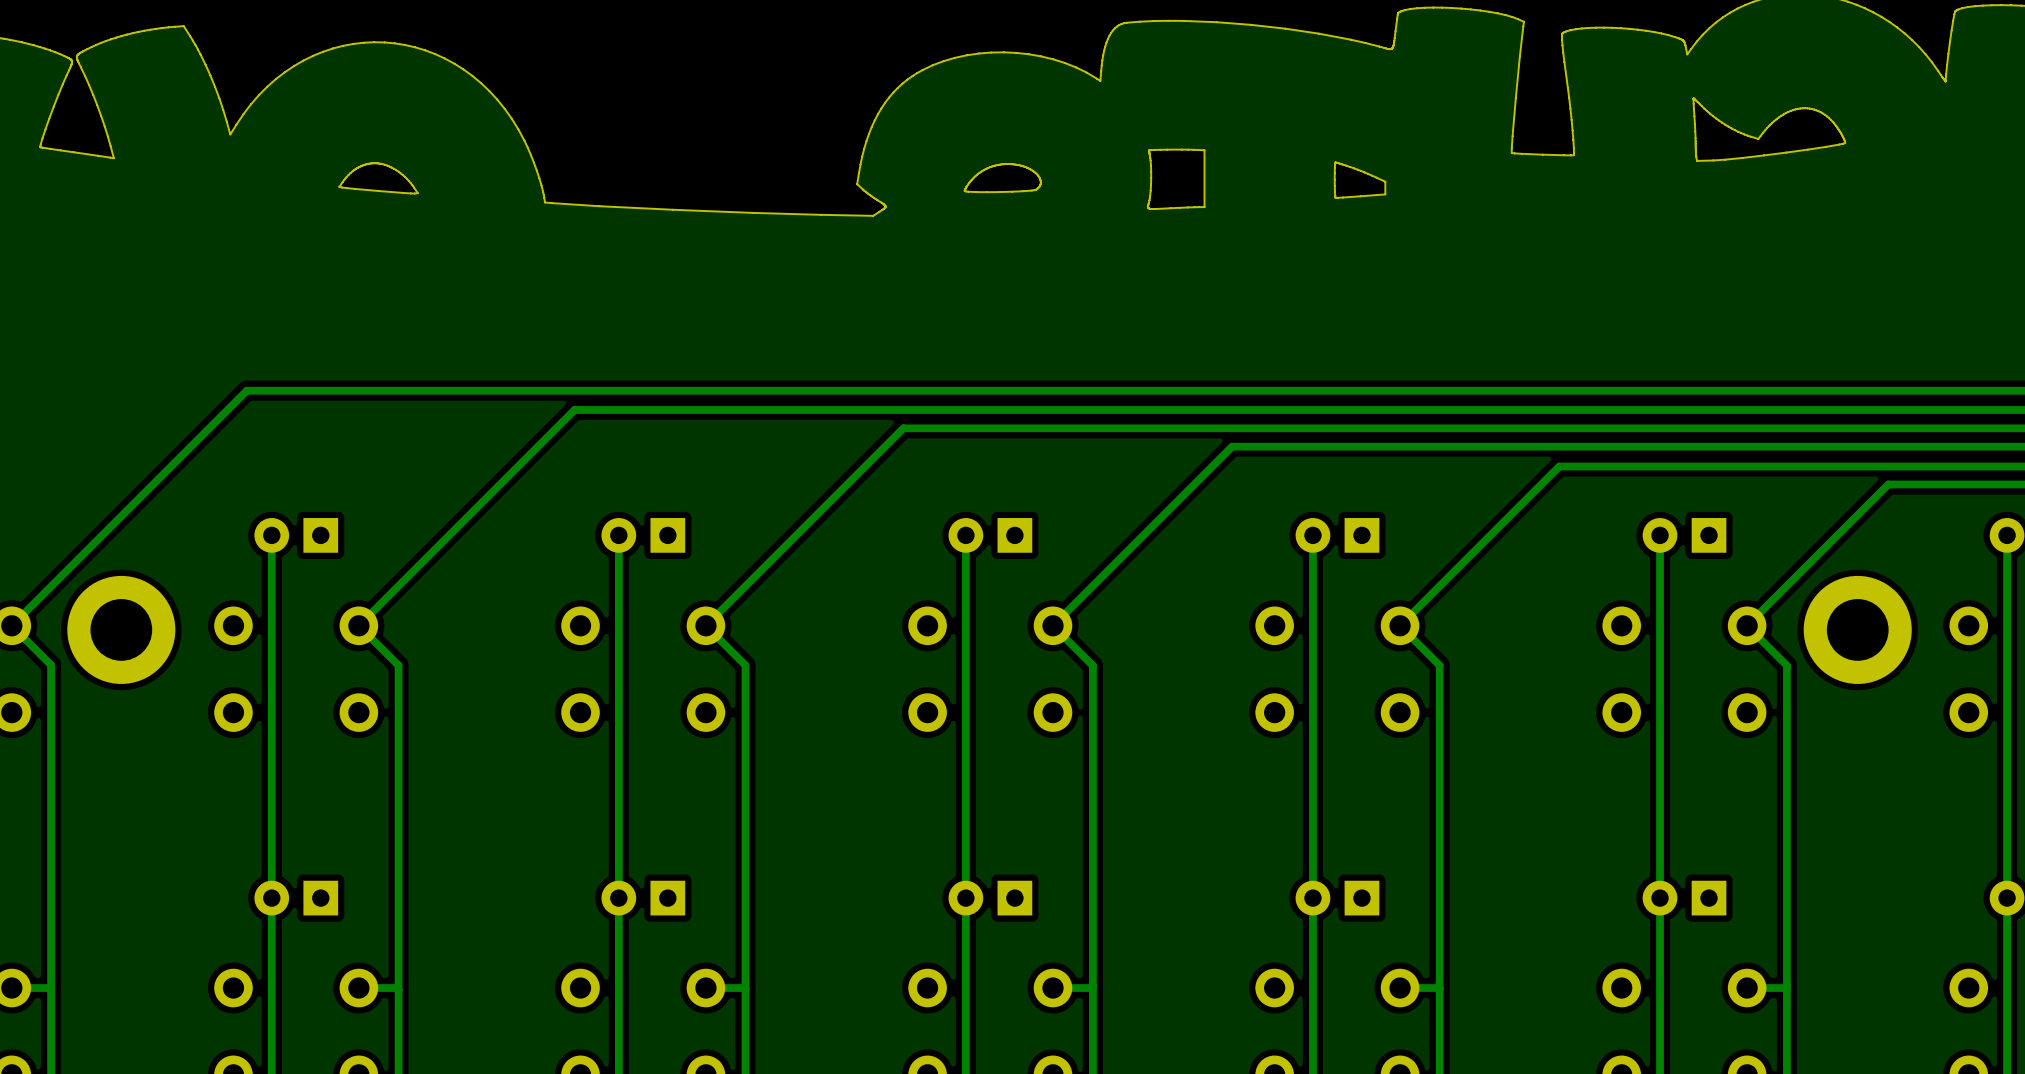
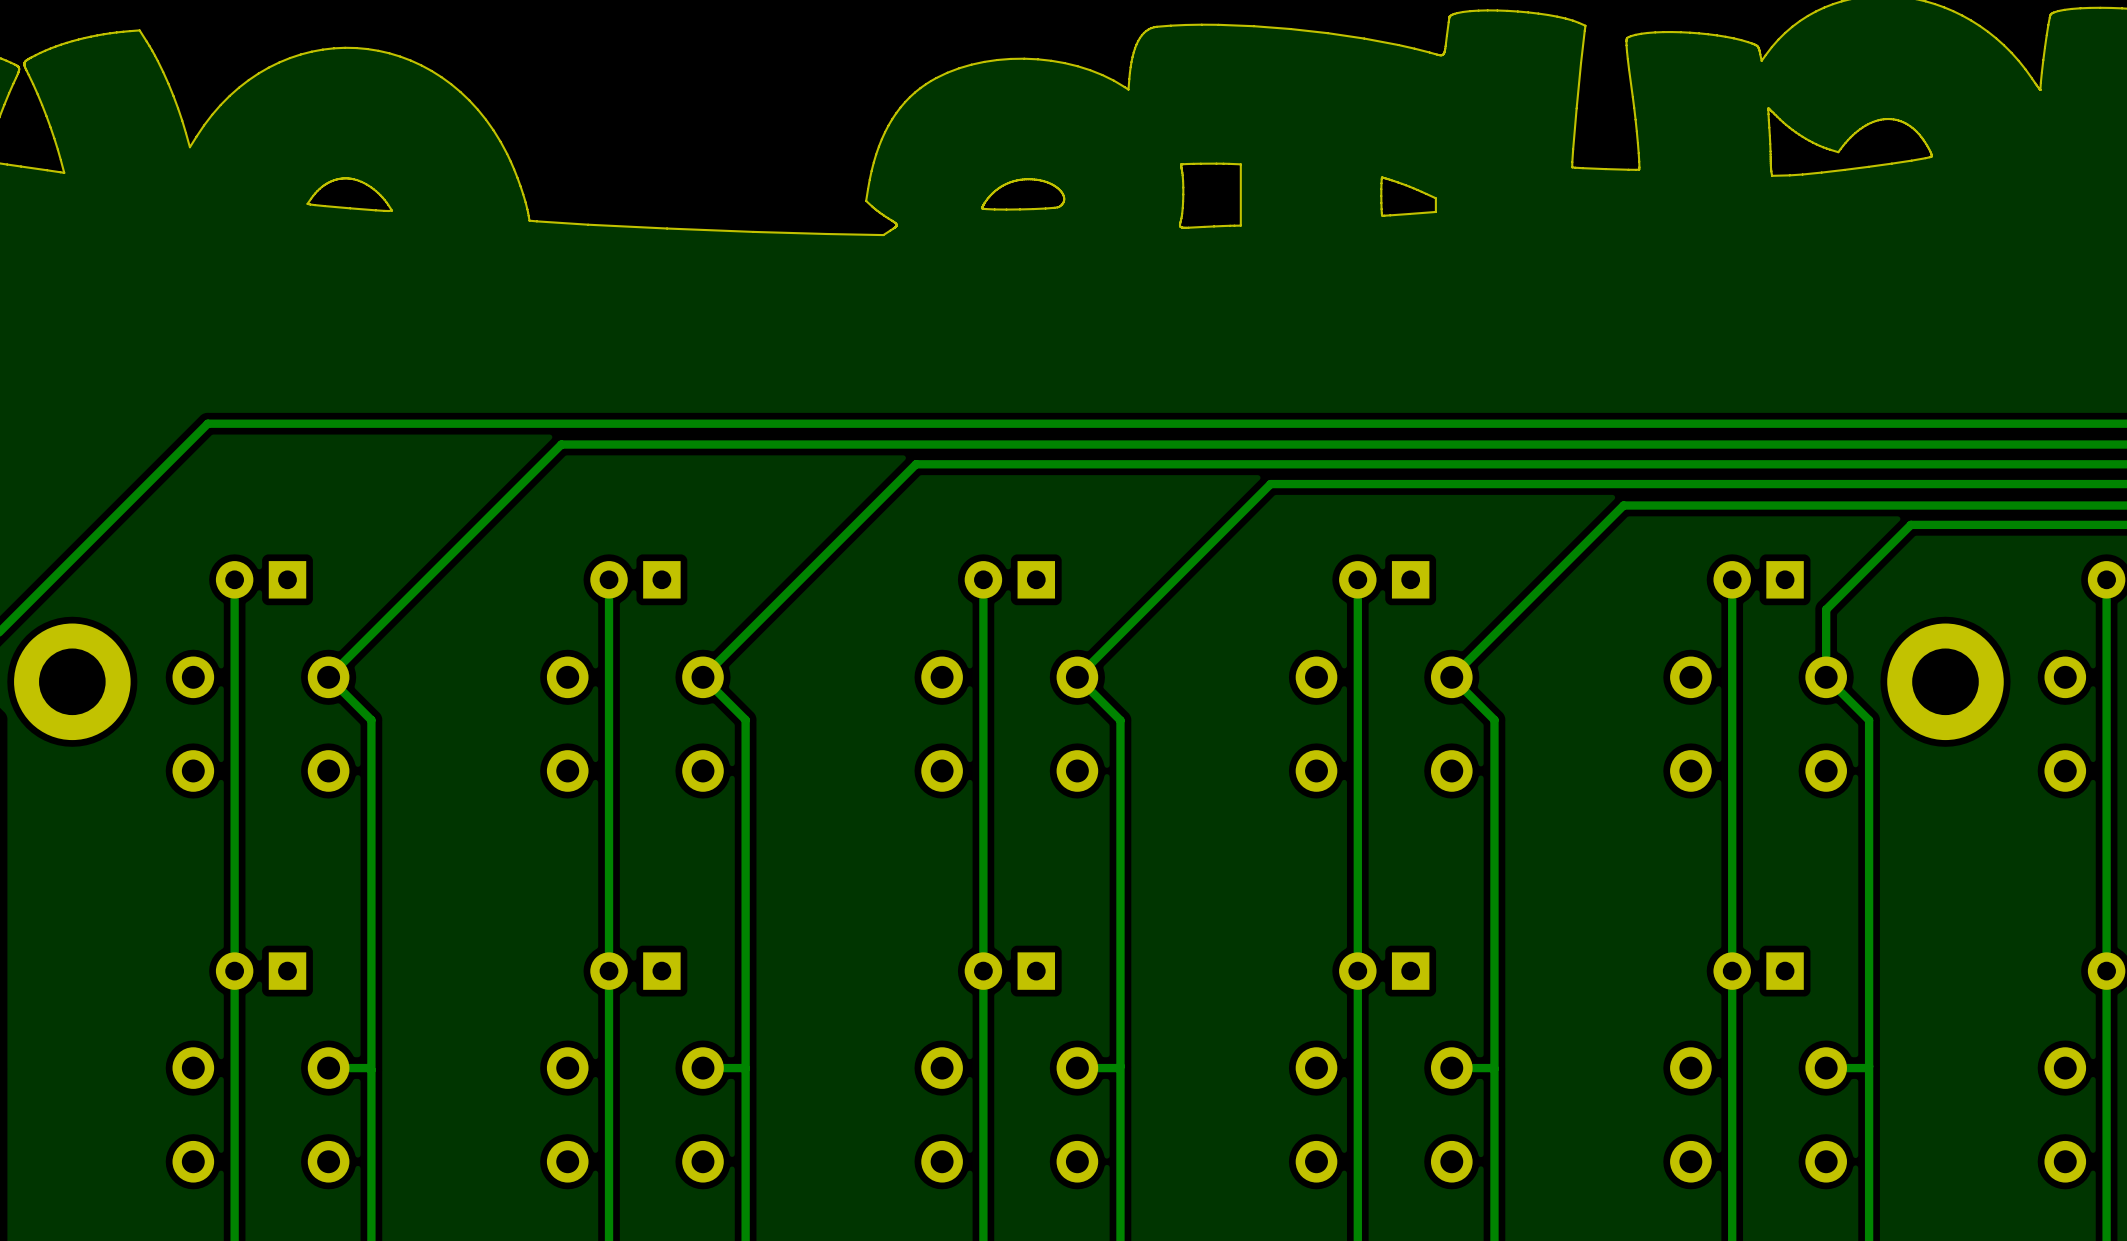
track: (1888, 484) (1747, 625) -> (1978, 524) (1910, 524) (1826, 609) (1826, 677)

